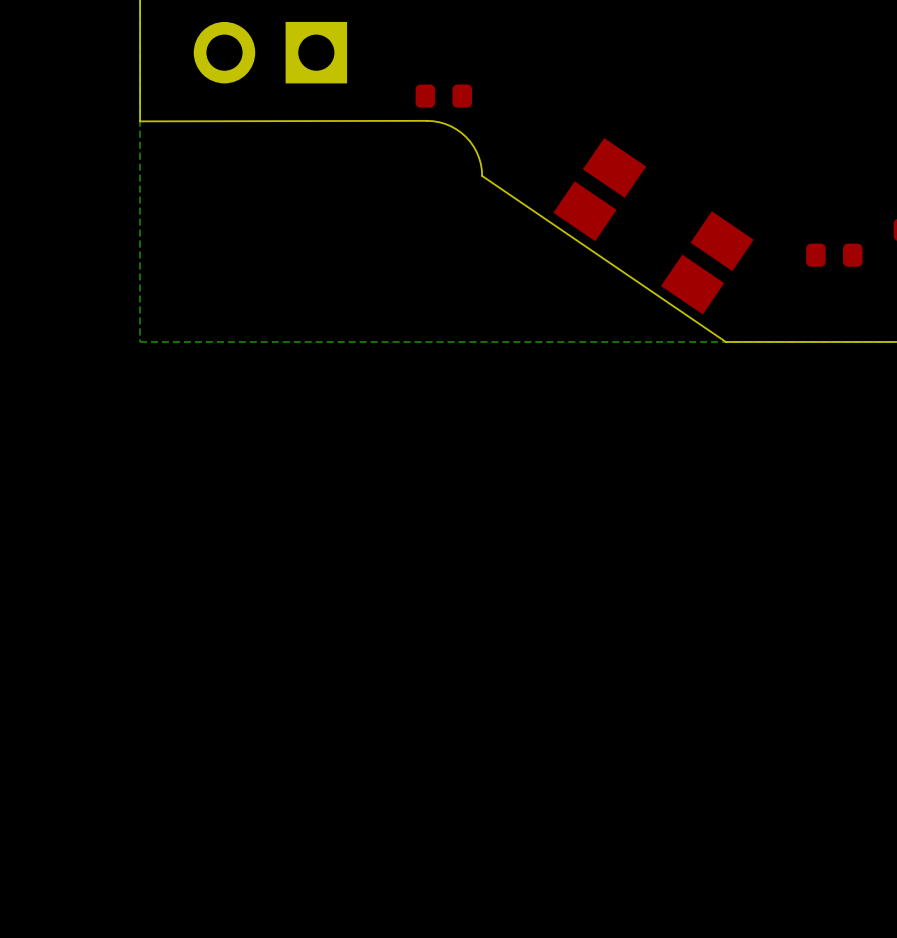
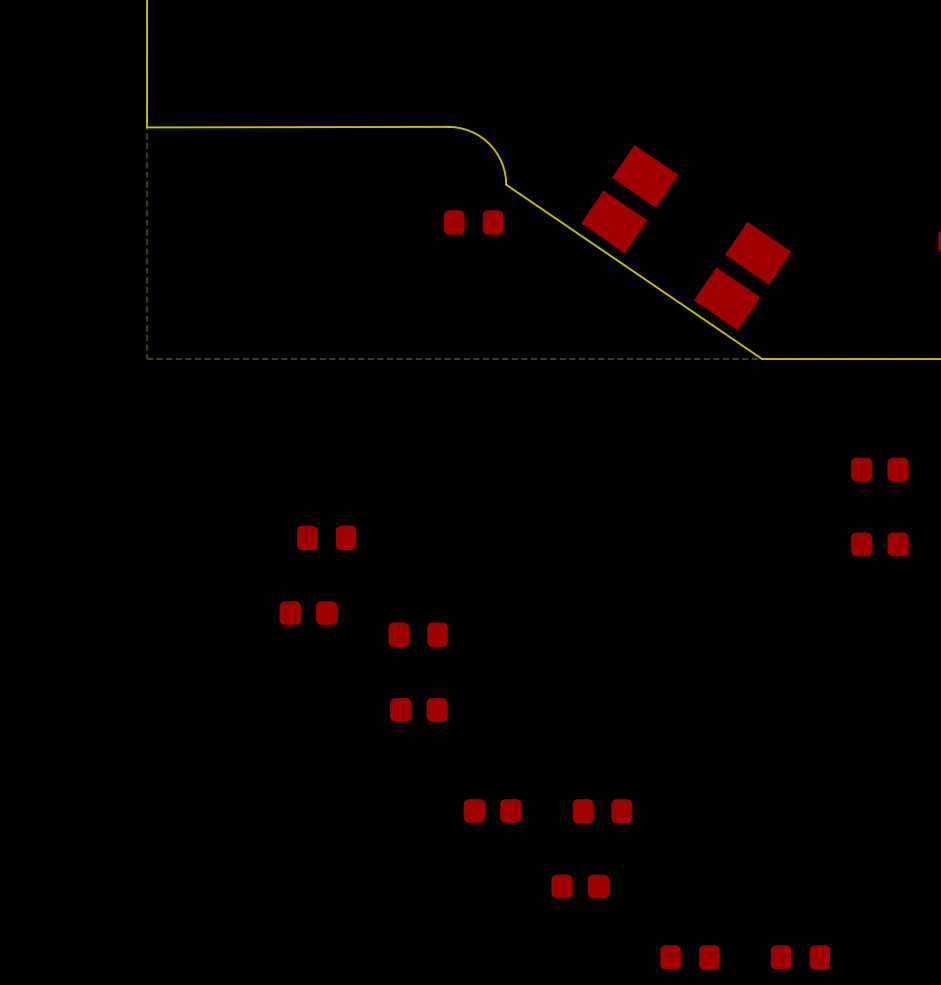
part: (270, 52) -> none
part position: (443, 96) -> (473, 222)
part: (834, 255) -> none
part: none -> (879, 469)
part: none -> (326, 537)
part: none -> (879, 544)
part: none -> (308, 613)
part: none -> (418, 634)
part: none -> (418, 709)
part: none -> (492, 810)
part: none -> (602, 811)
part: none -> (580, 886)
part: none -> (689, 957)
part: none -> (800, 957)

